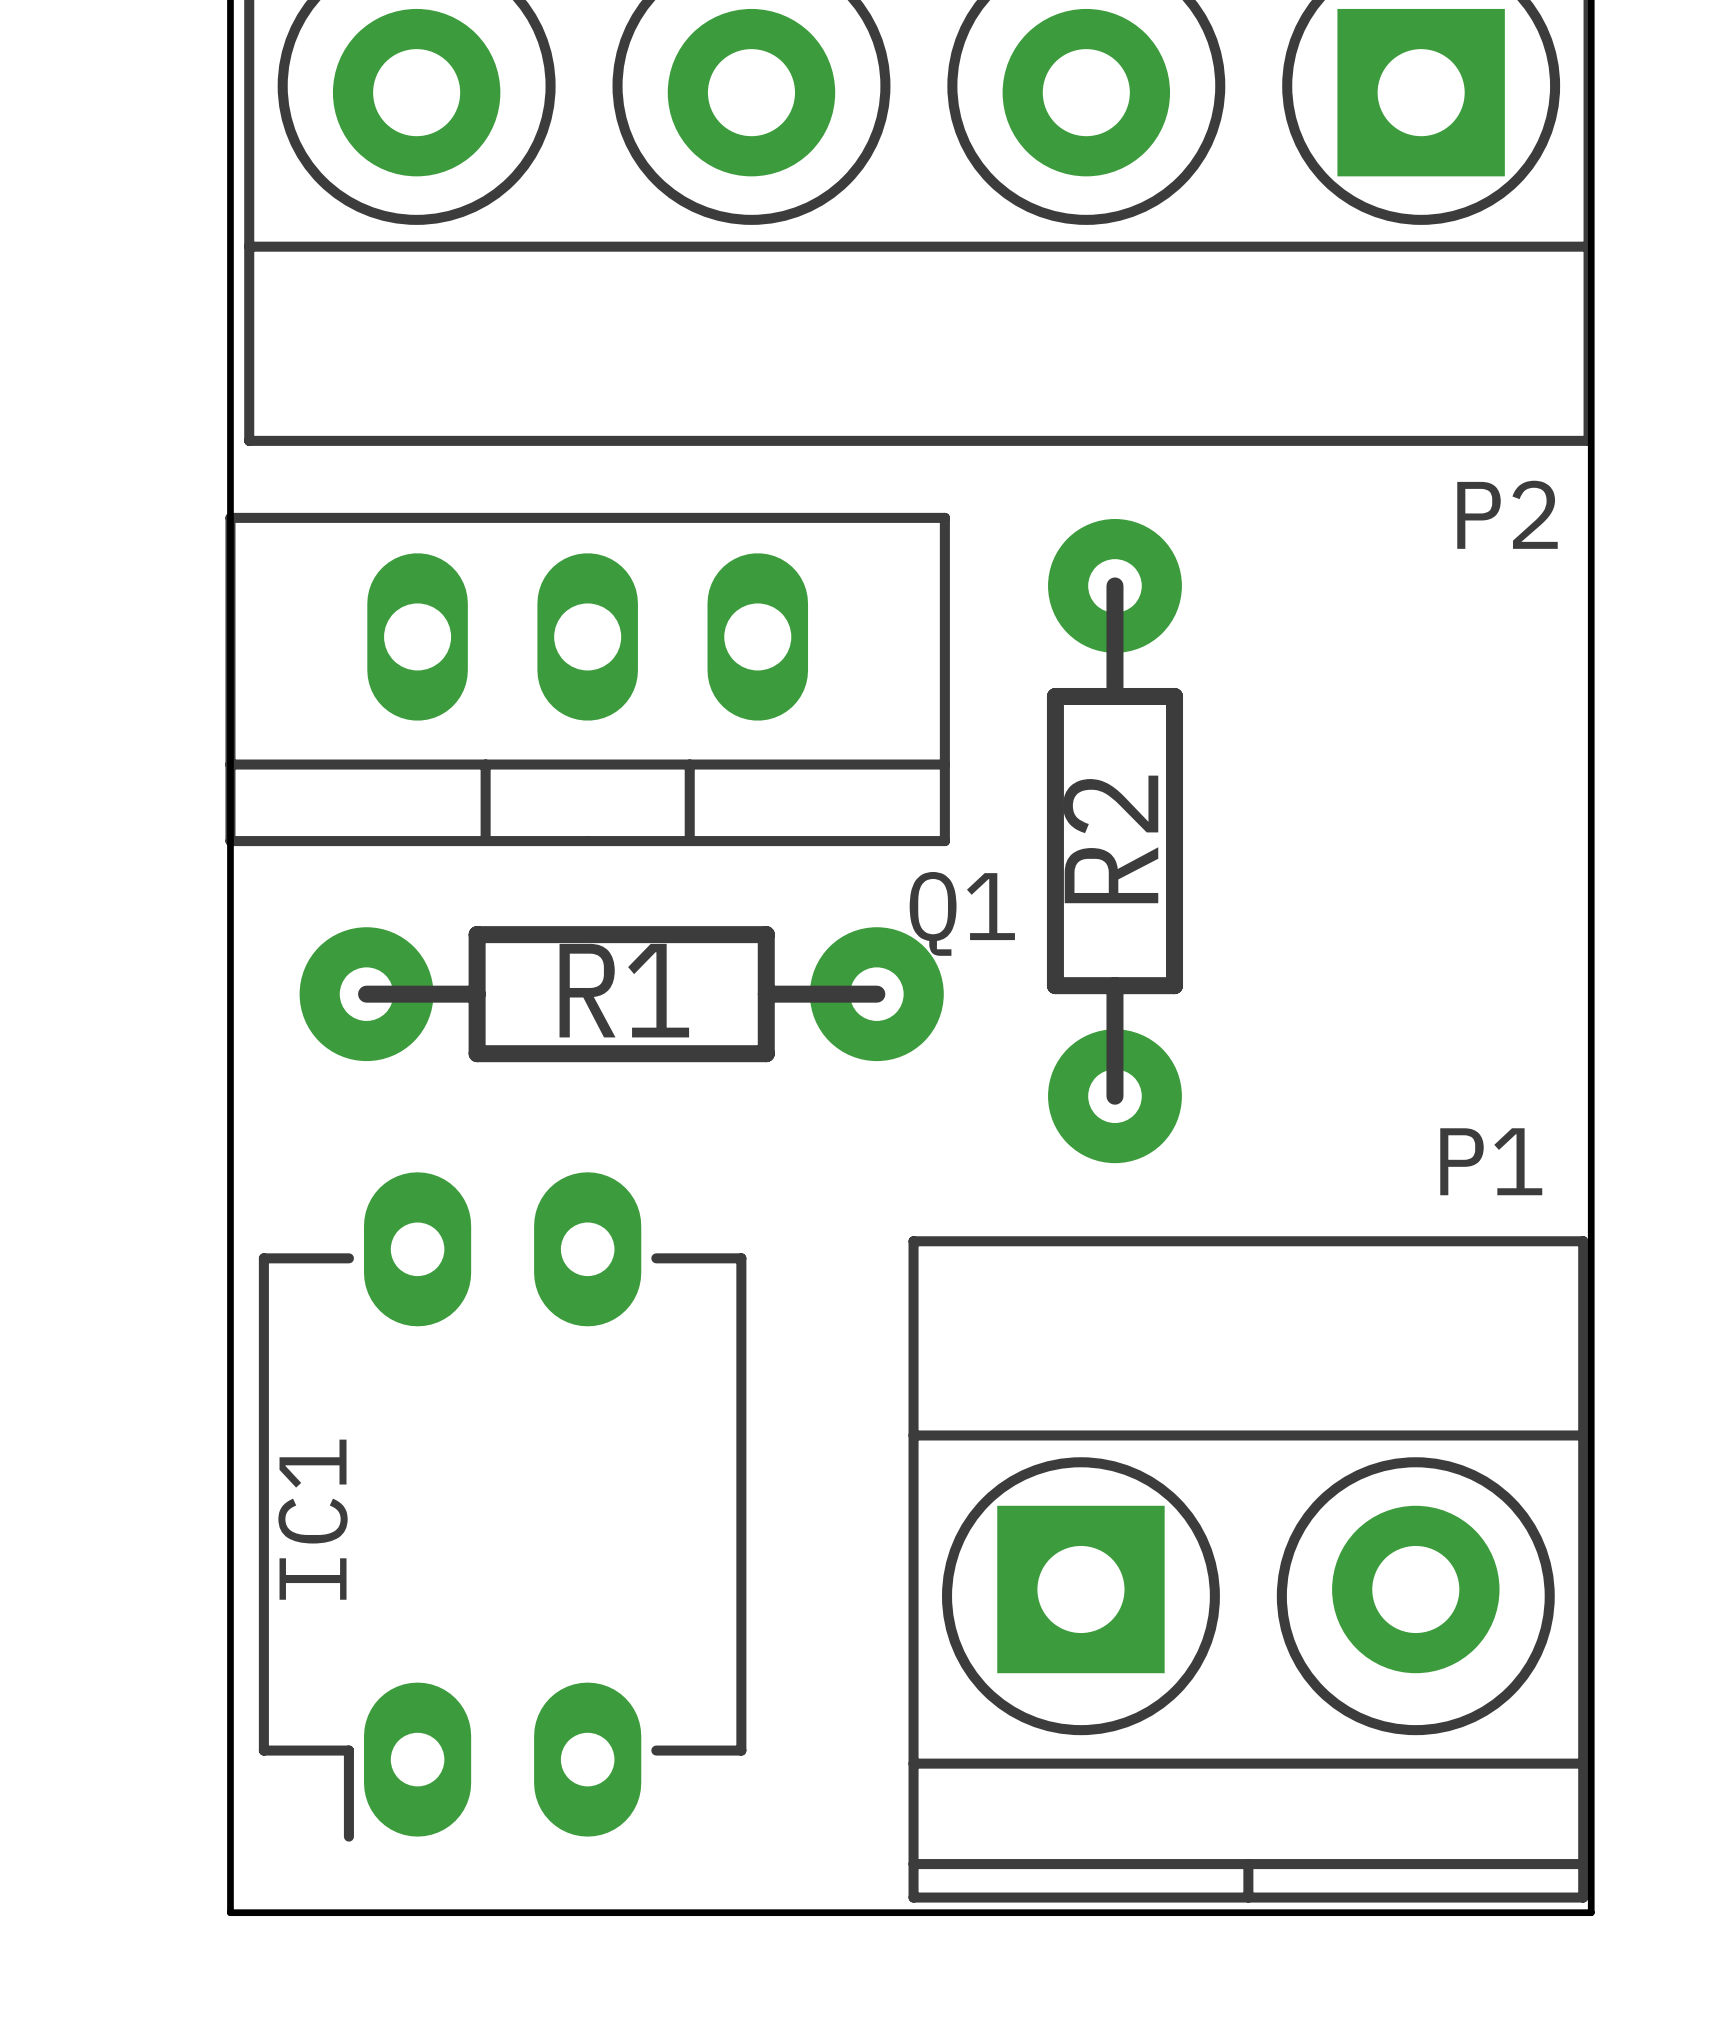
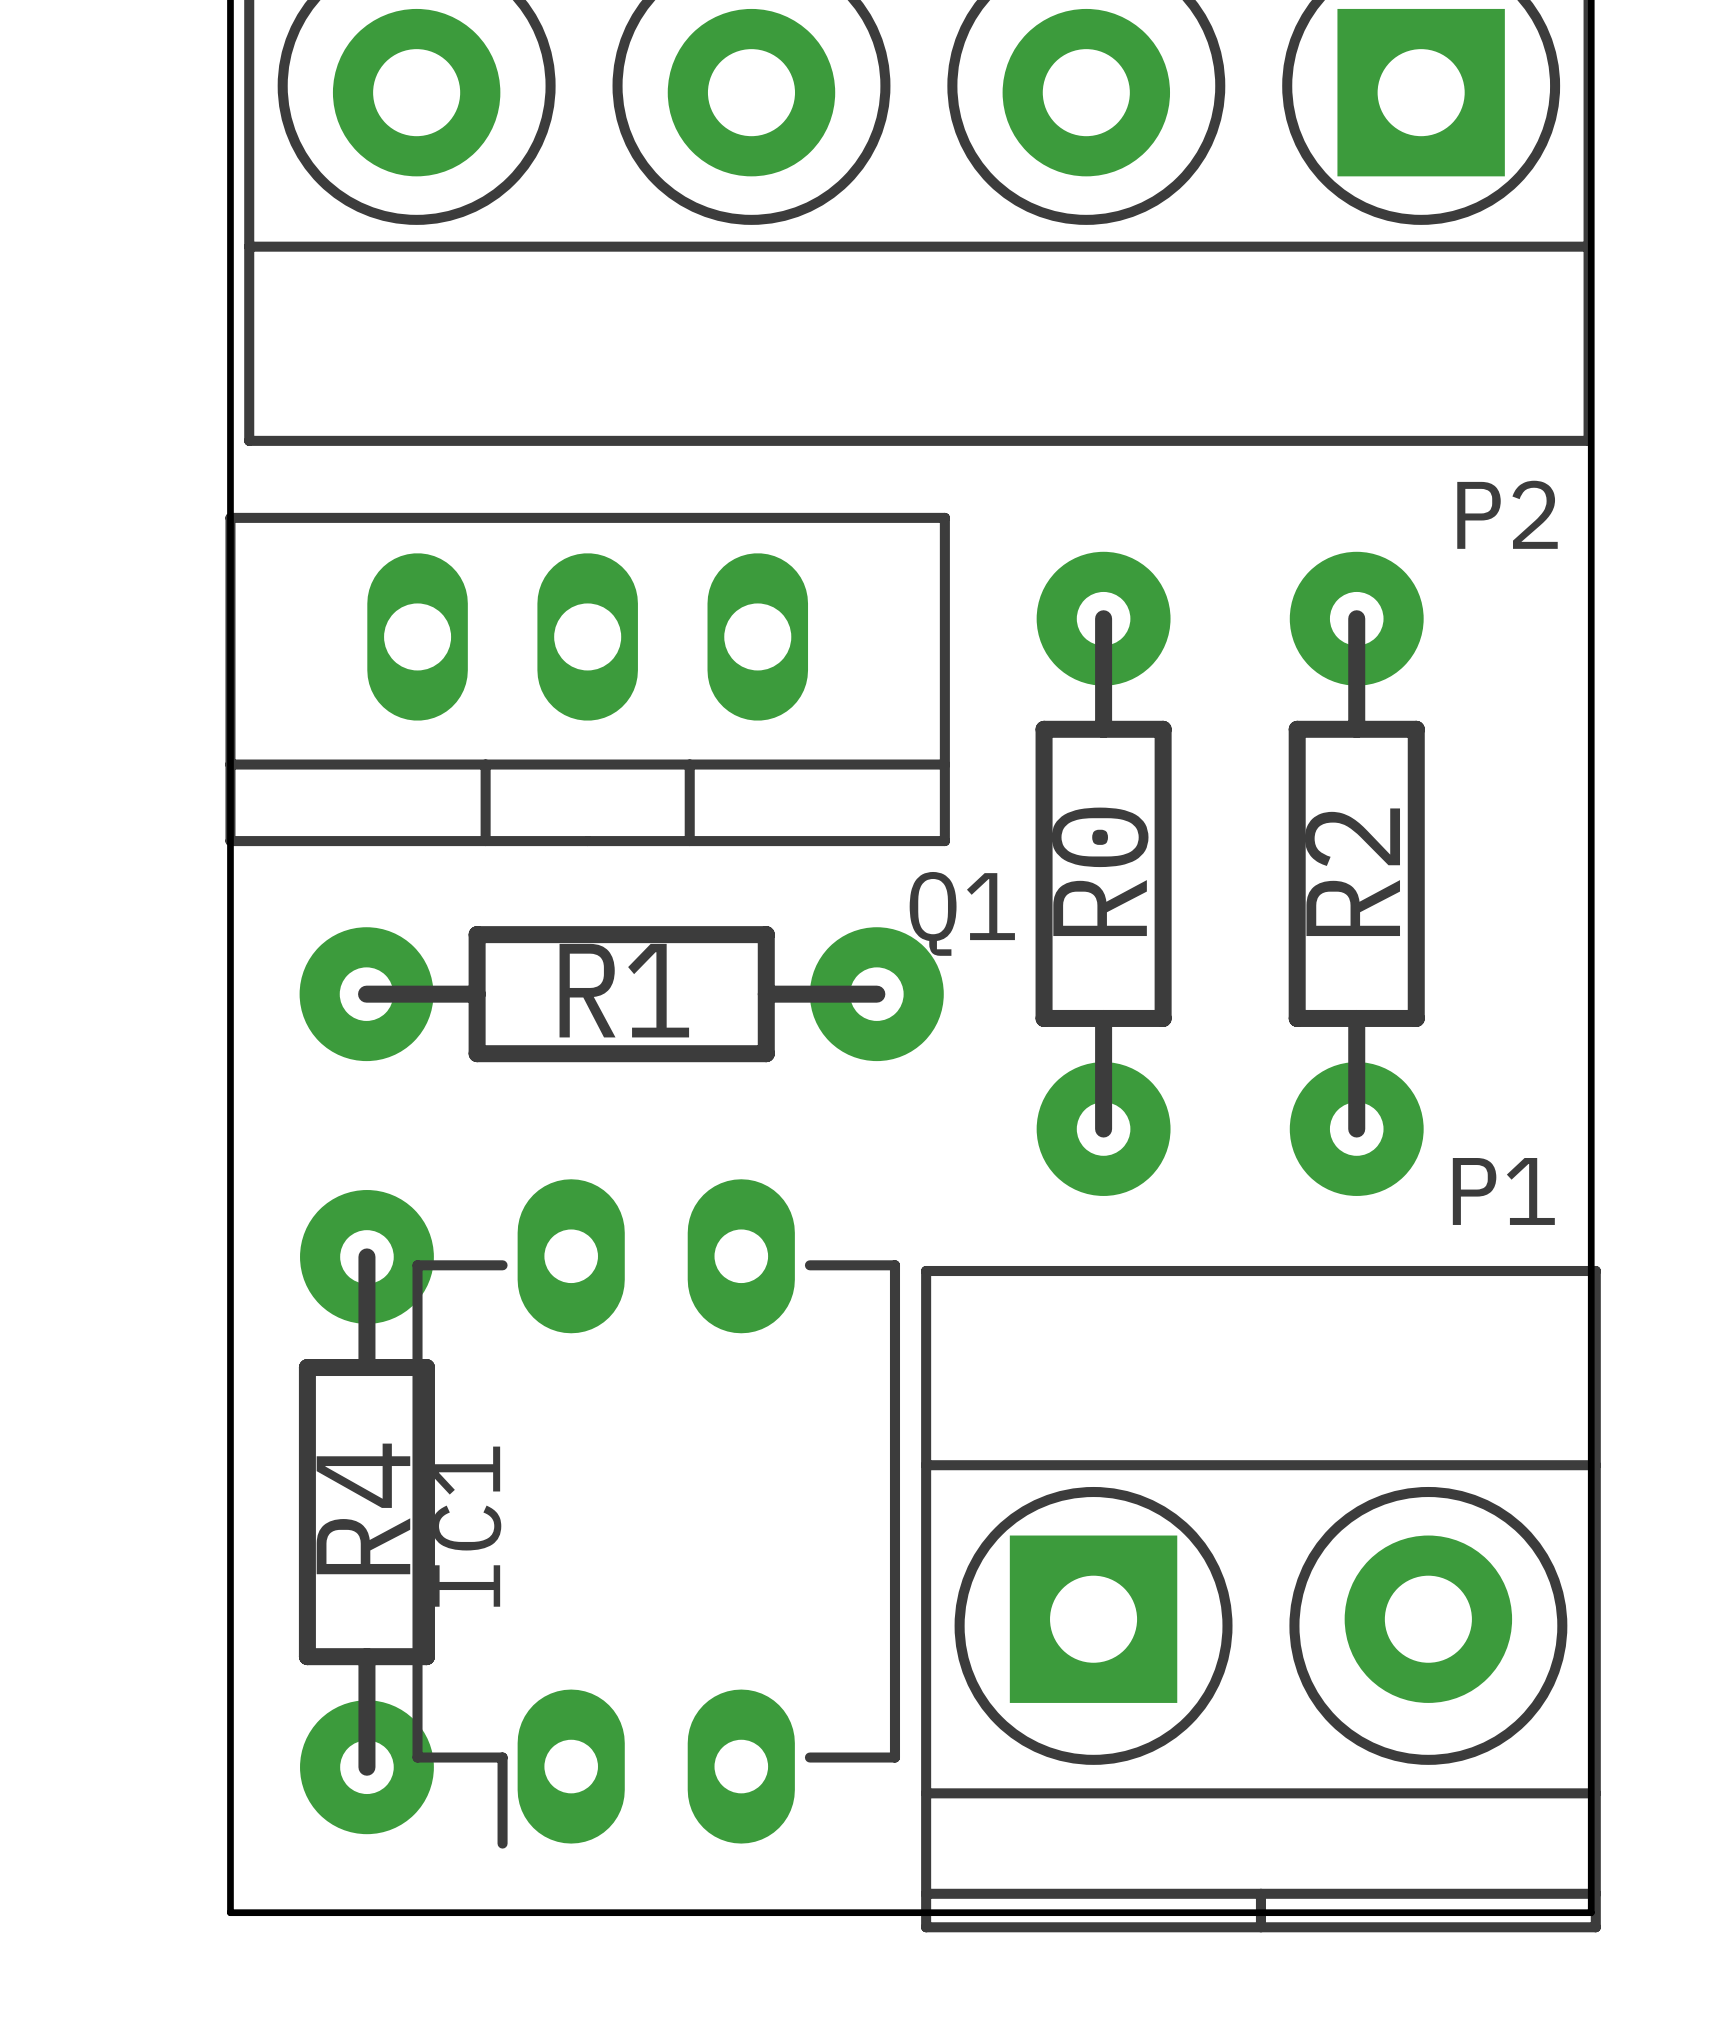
R2 position: (1114, 841) -> (1356, 873)
R0: none -> (1103, 873)
IC1 position: (502, 1506) -> (656, 1513)
R4: none -> (366, 1512)
P1 position: (1248, 1569) -> (1260, 1599)

